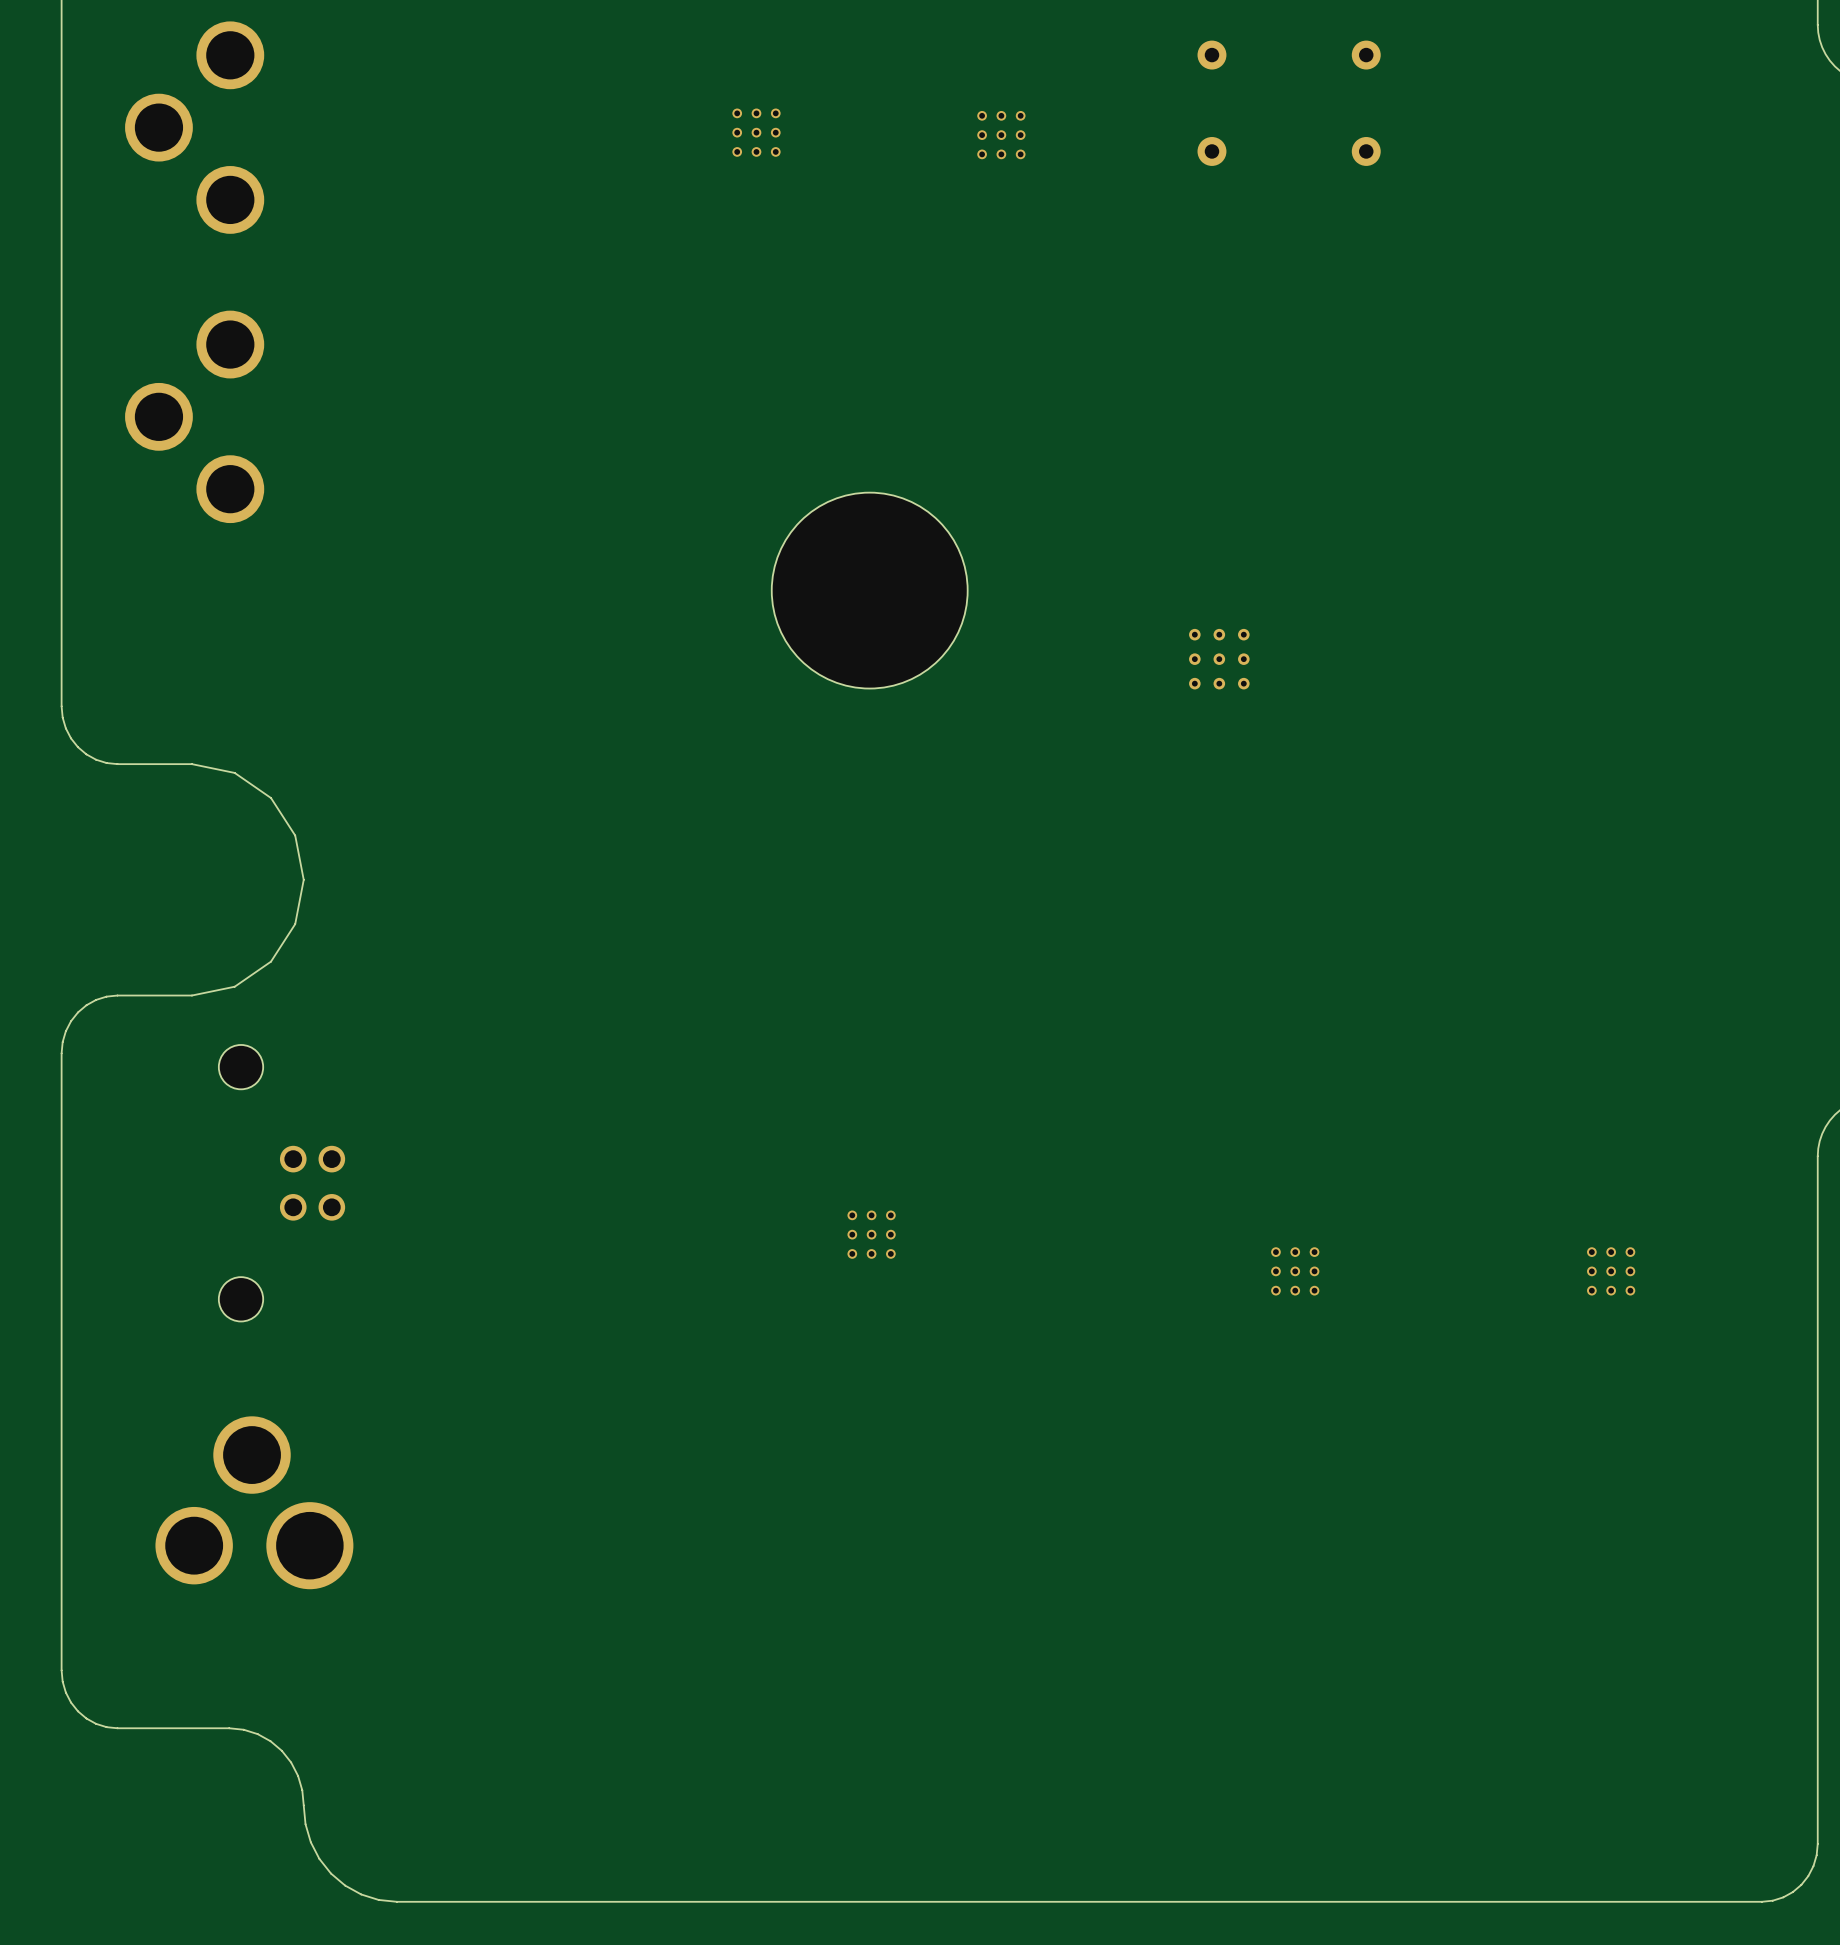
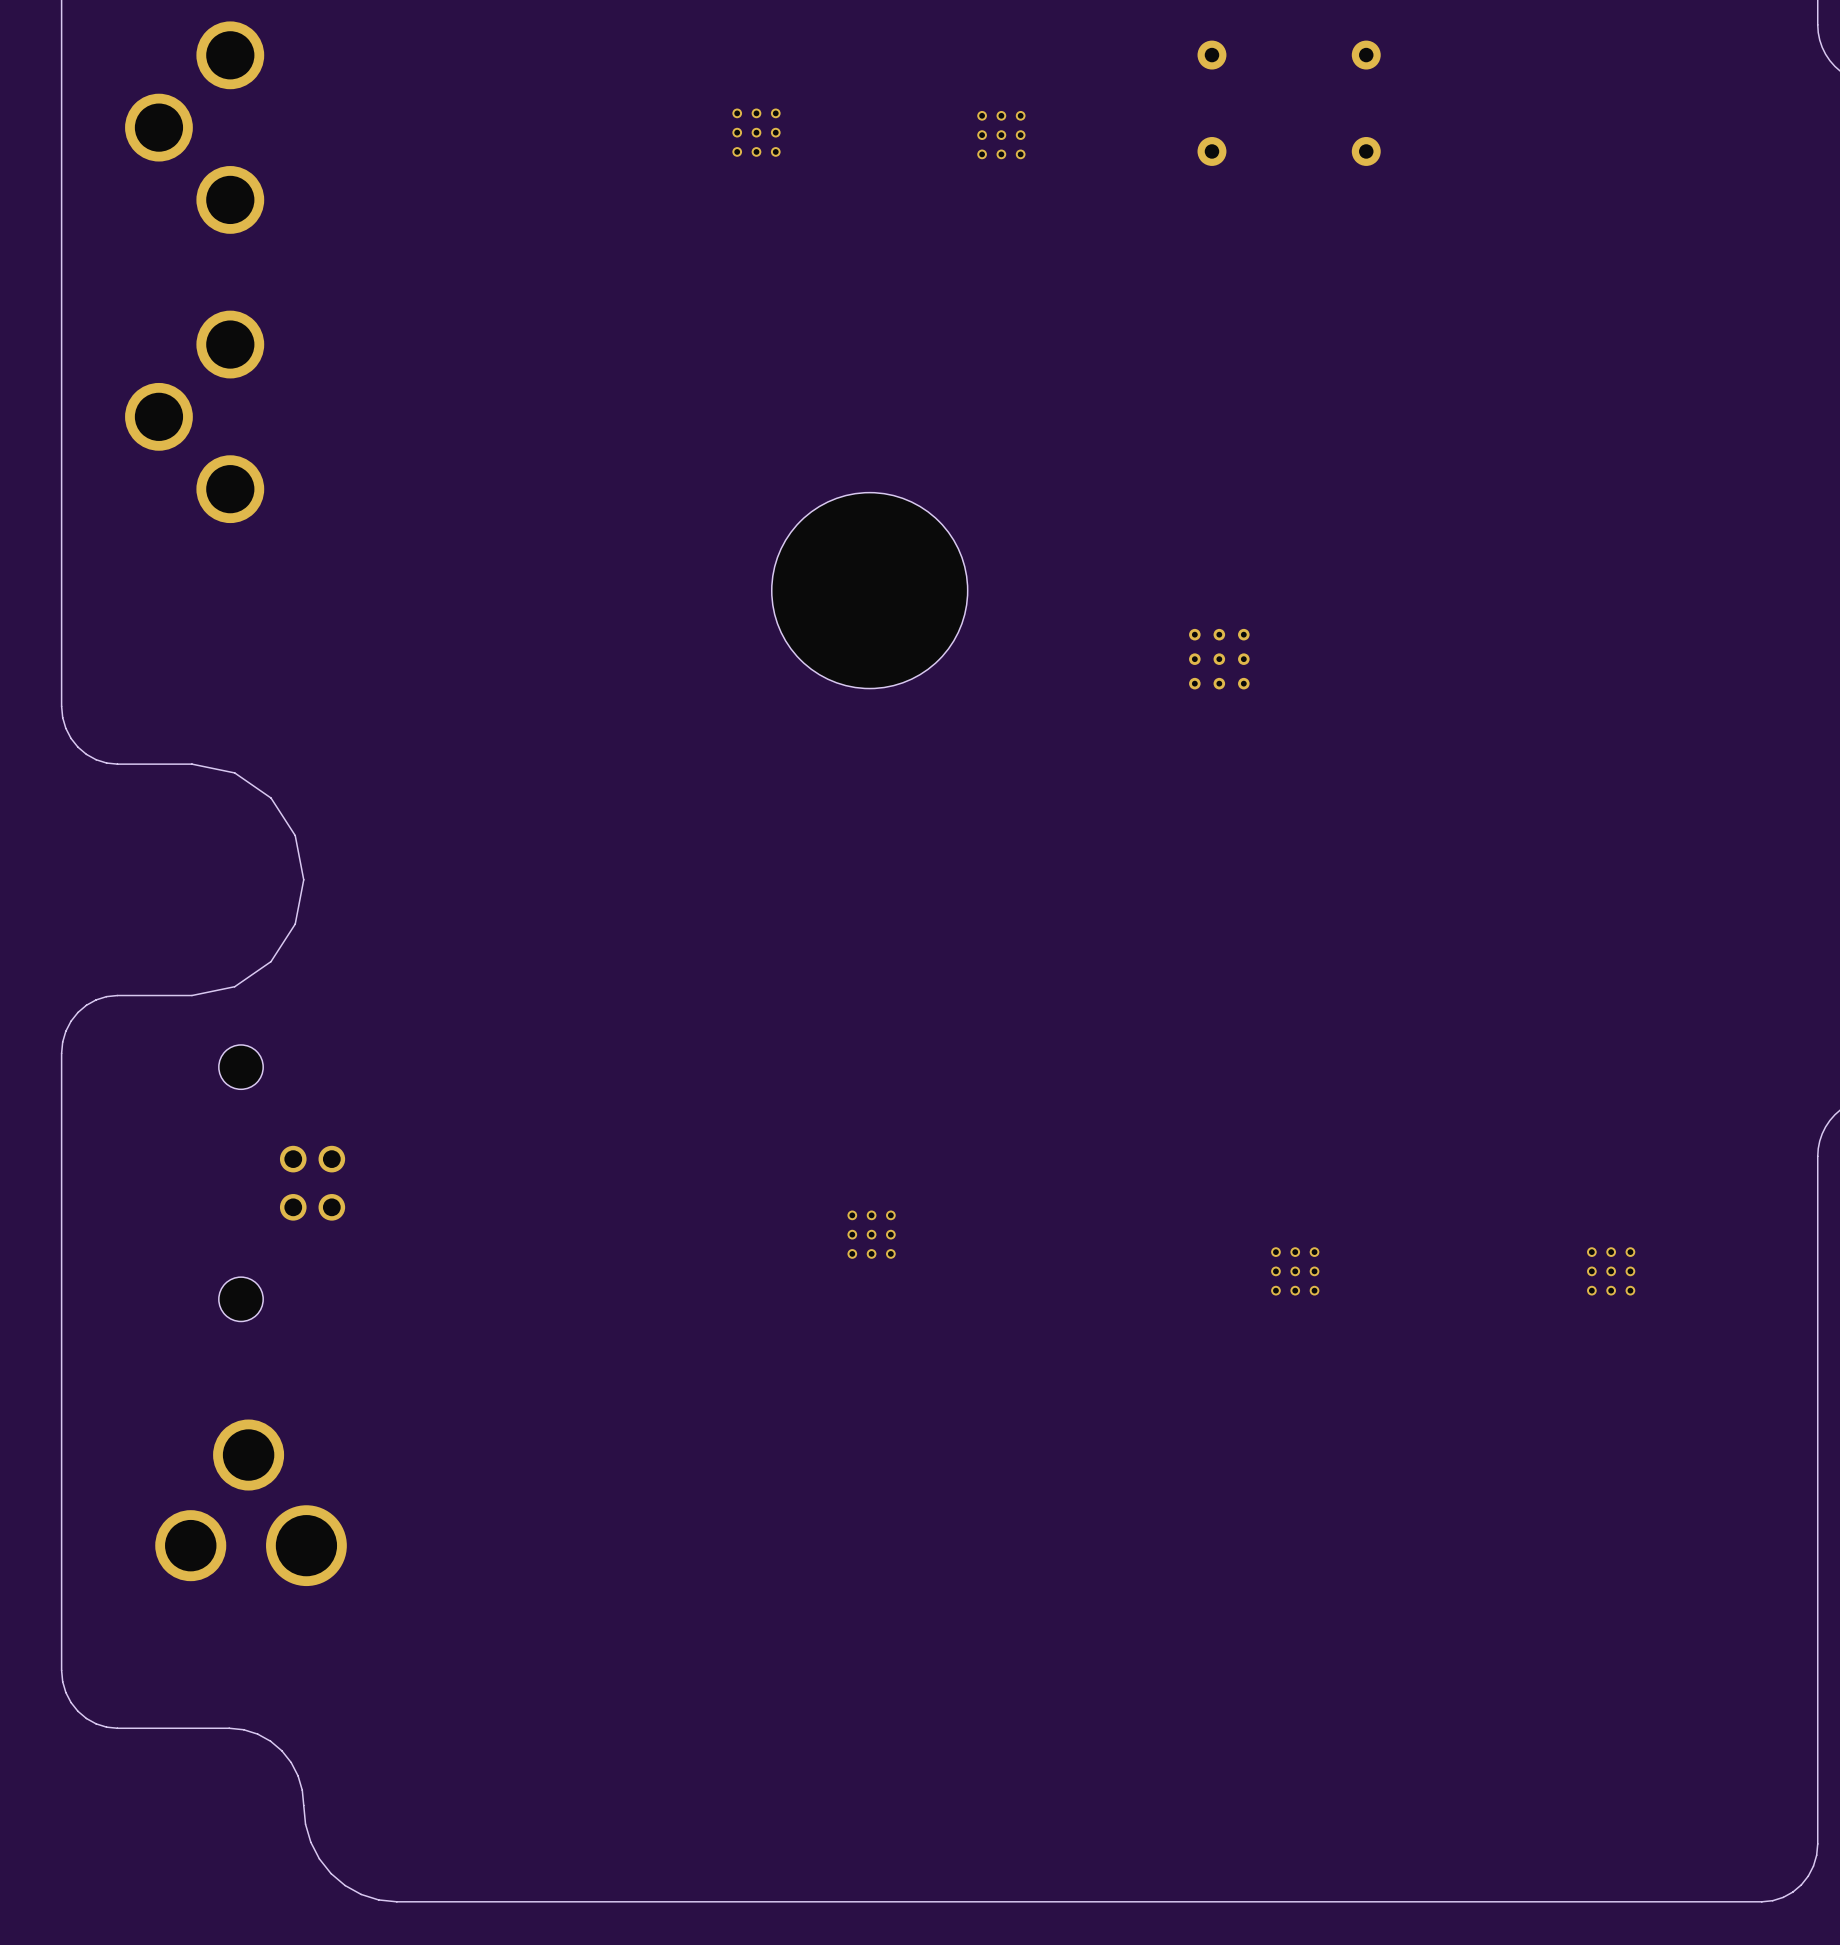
part footprint: [155, 1416, 354, 1590] -> [155, 1419, 347, 1587]

